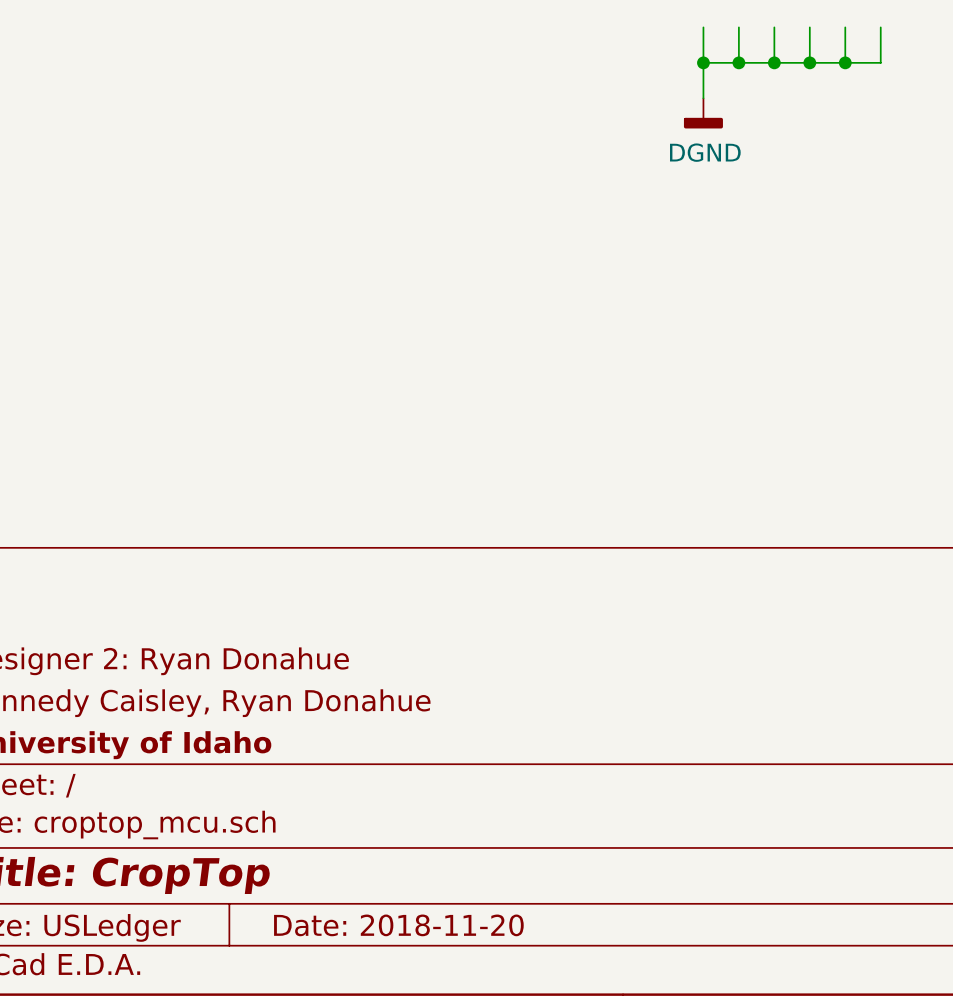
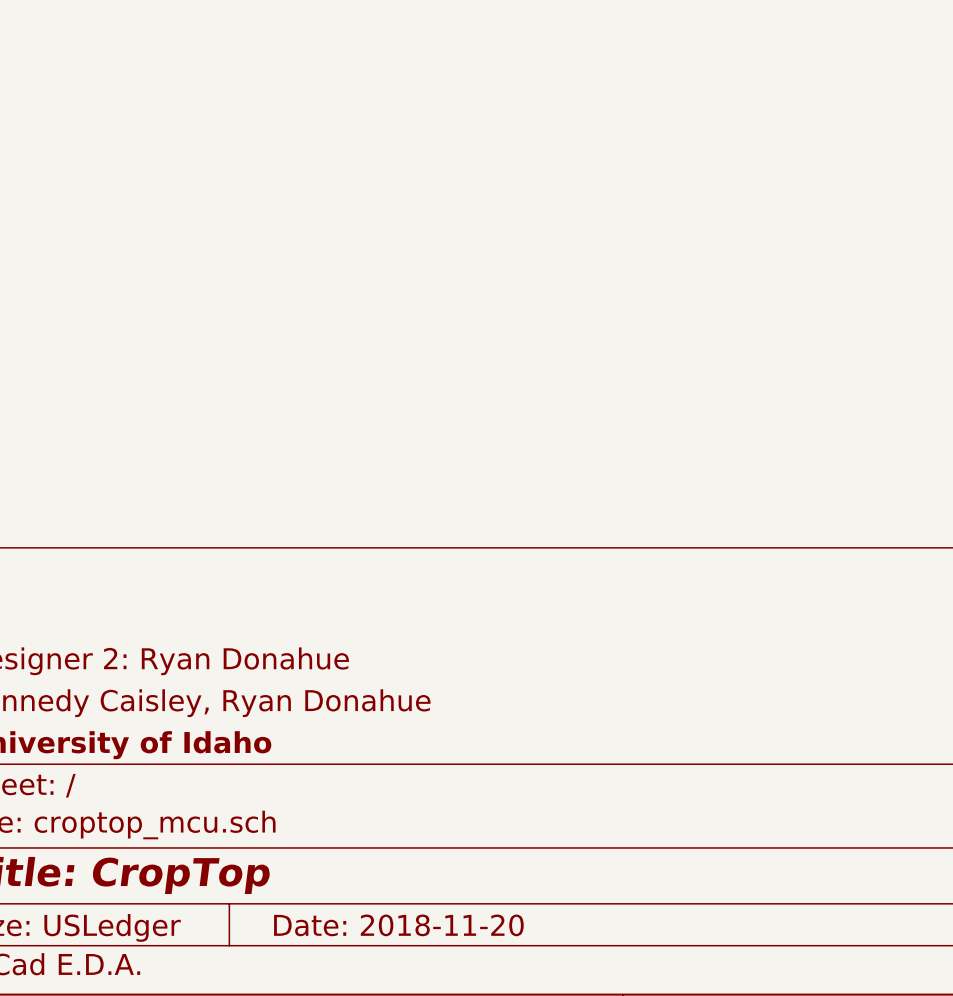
wire: (703, 27) (703, 98) -> none
wire: (738, 27) (738, 62) -> none
wire: (774, 27) (774, 62) -> none
wire: (809, 27) (809, 62) -> none
wire: (845, 27) (845, 62) -> none
wire: (880, 27) (880, 62) (703, 62) -> none
junction: (703, 62) -> none
junction: (738, 62) -> none
junction: (774, 62) -> none
junction: (809, 62) -> none
junction: (845, 62) -> none
power symbol: DGND (703, 113) -> none

